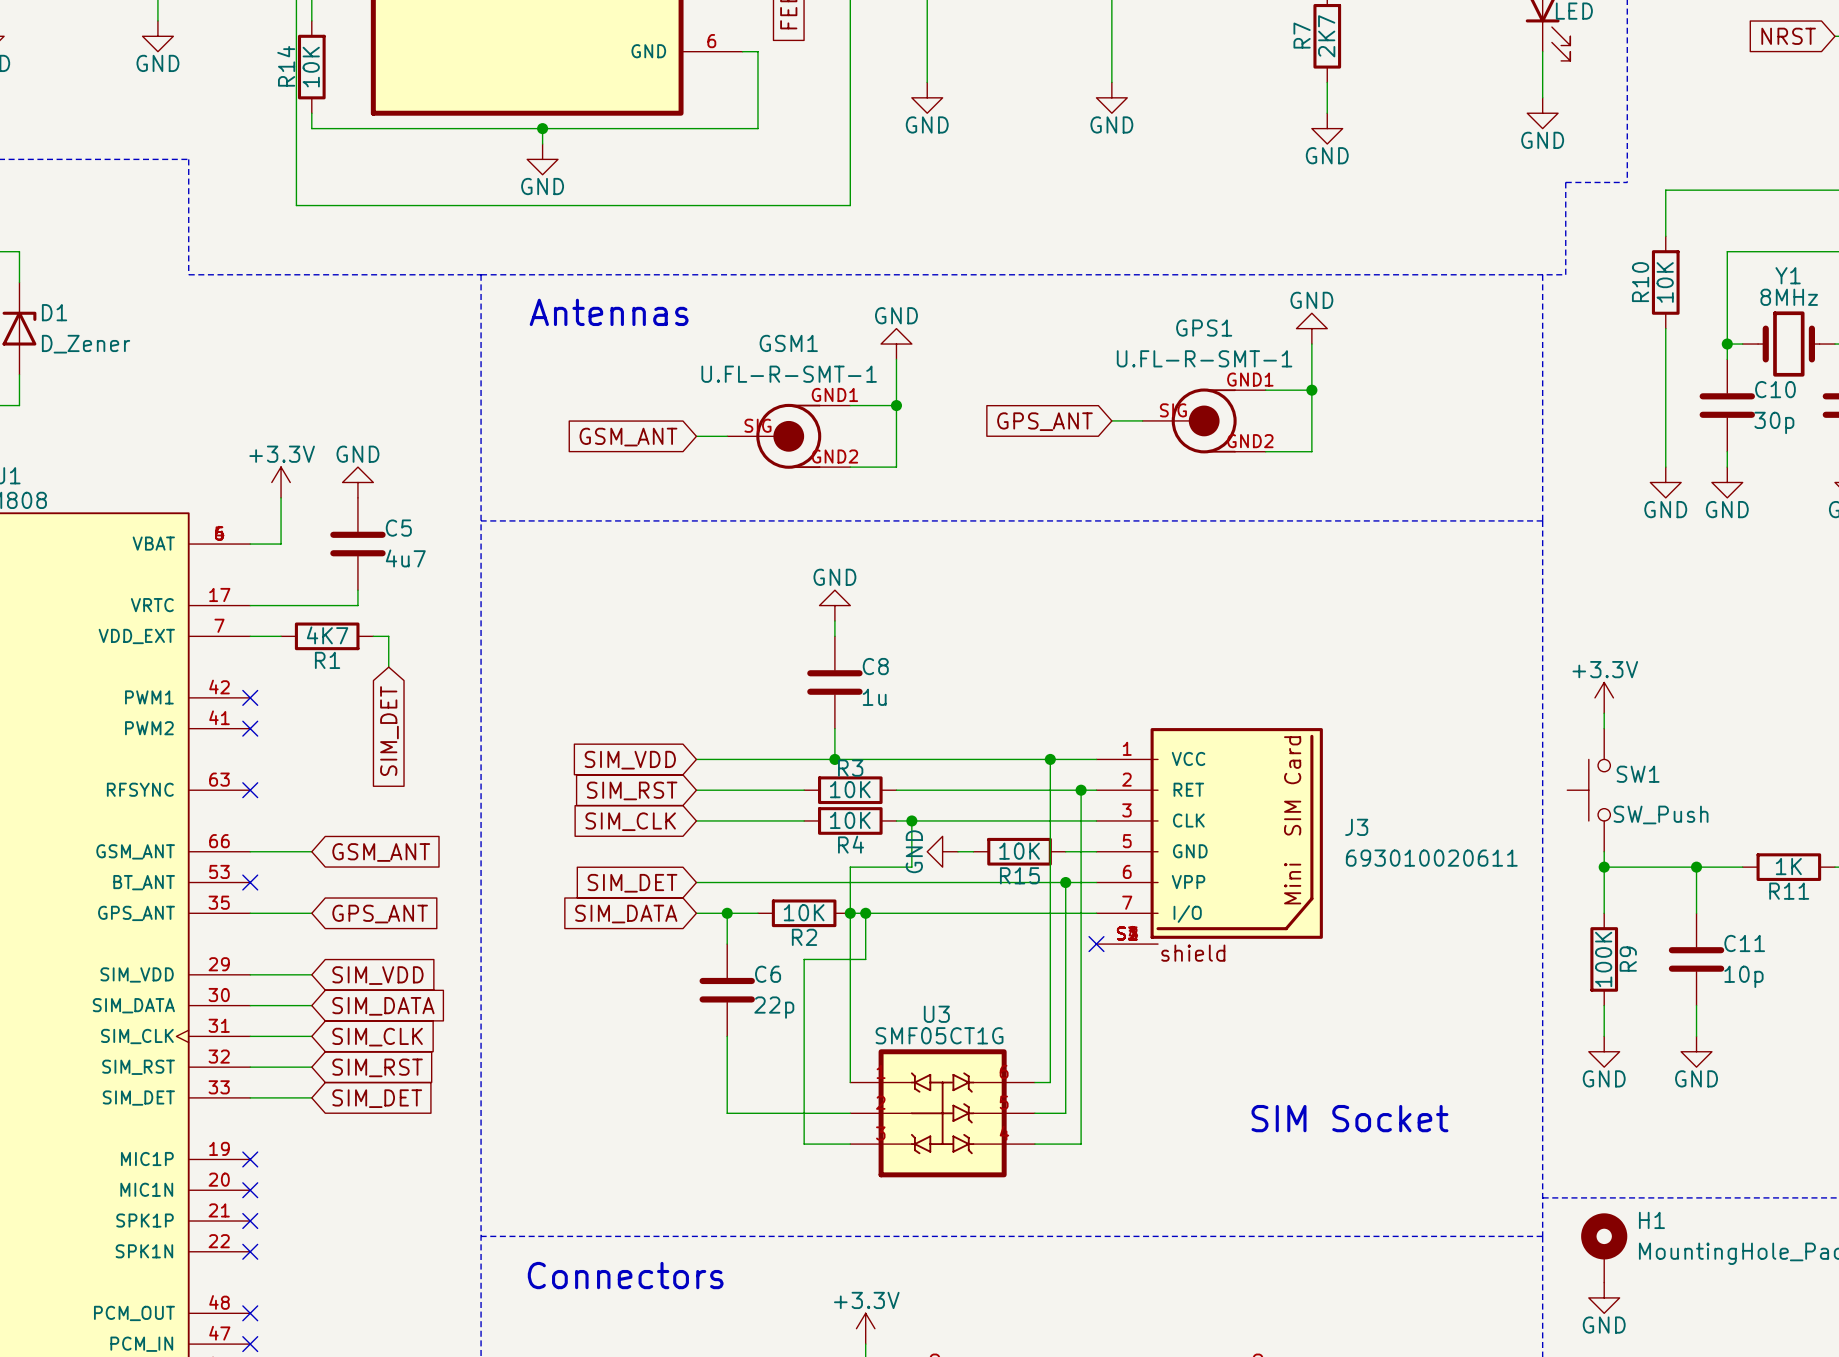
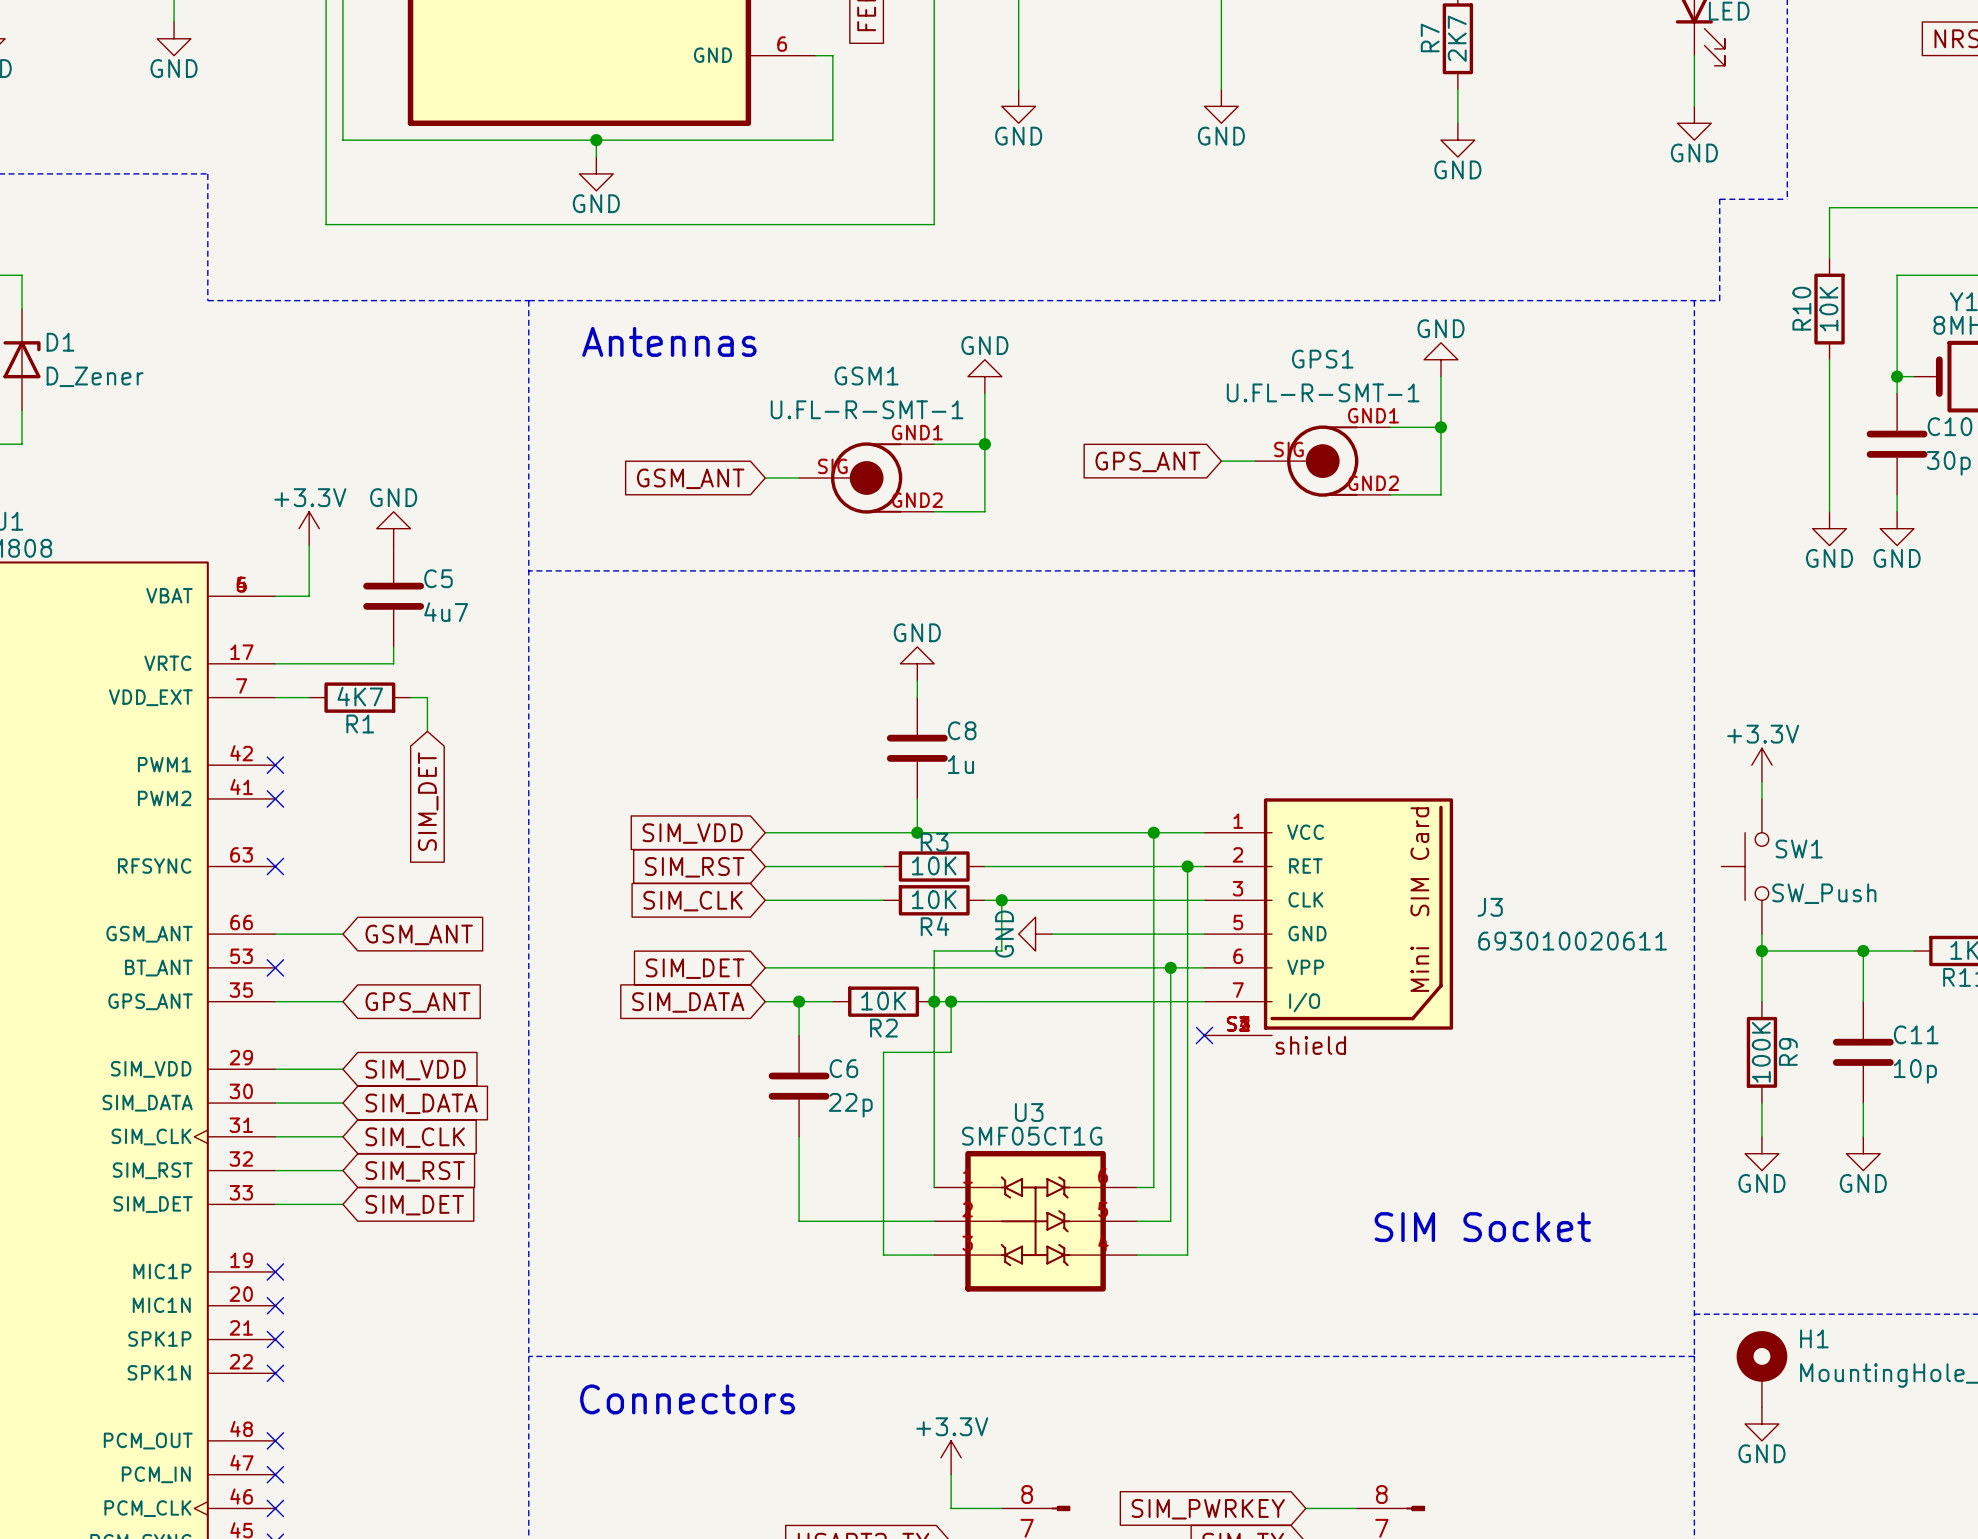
wire: none -> (342, 21) (342, 123)
R14: 10K (311, 67) -> none
wire: none -> (1069, 934) (1170, 934)
R15: 10K (1019, 851) -> none

